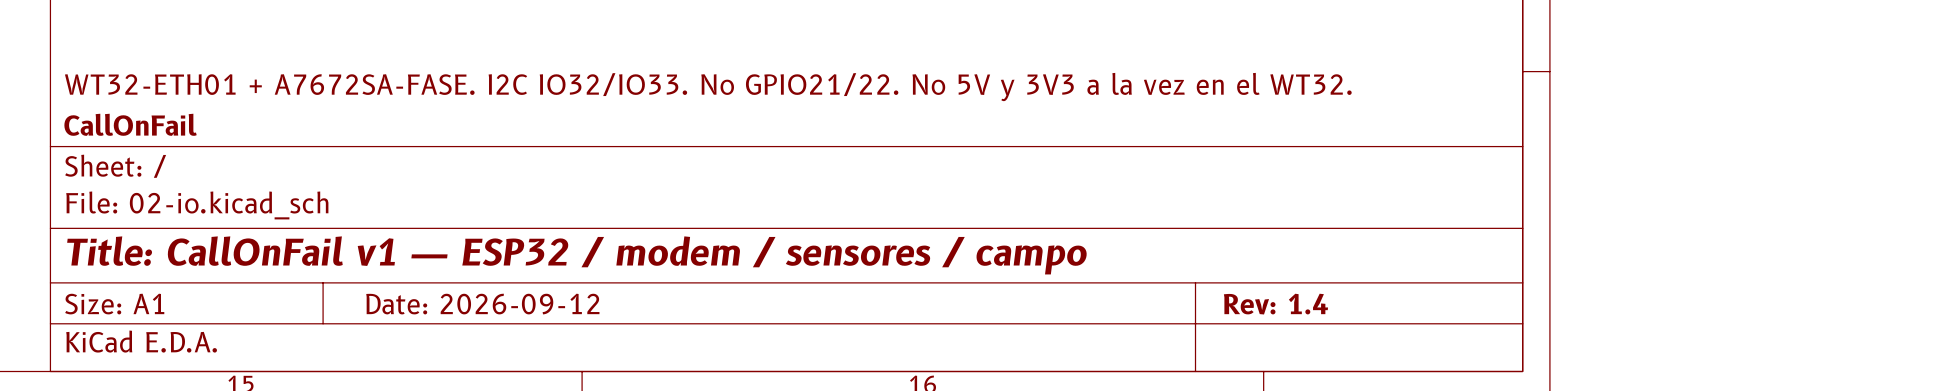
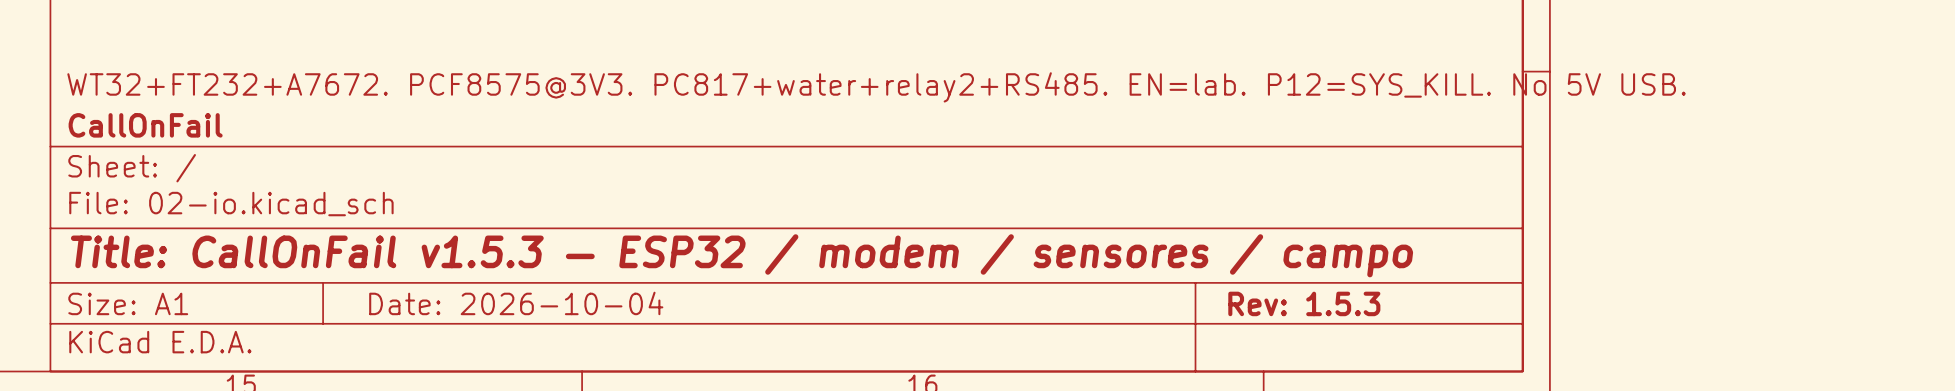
title block: WT32-ETH01 + A7672SA-FASE. I2C IO32/IO33. No GPIO21/22. No 5V y 3V3 a la vez en el WT32. (708, 87) -> WT32+FT232+A7672. PCF8575@3V3. PC817+water+relay2+RS485. EN=lab. P12=SYS_KILL. No 5V USB. (876, 87)
title block: Title: CallOnFail v1 — ESP32 / modem / sensores / campo (576, 255) -> Title: CallOnFail v1.5.3 — ESP32 / modem / sensores / campo (742, 255)
title block: Date: 2026-09-12 (482, 304) -> Date: 2026-10-04 (516, 303)
title block: Rev: 1.4 (1275, 304) -> Rev: 1.5.3 (1304, 303)

